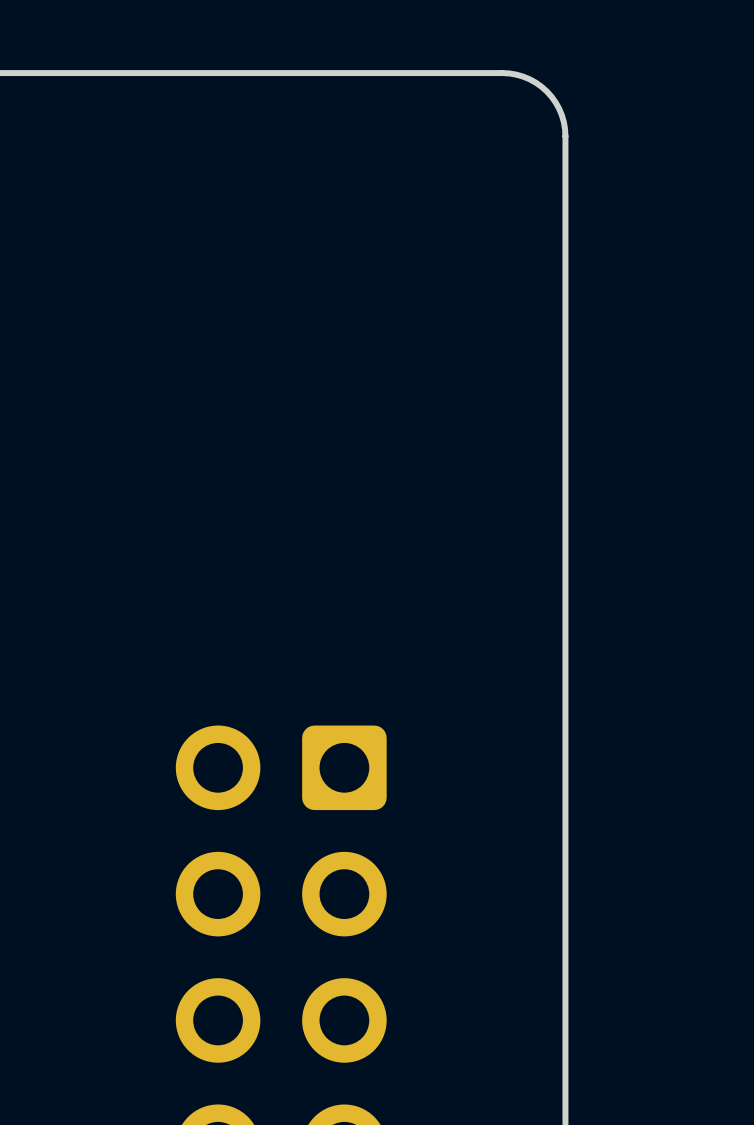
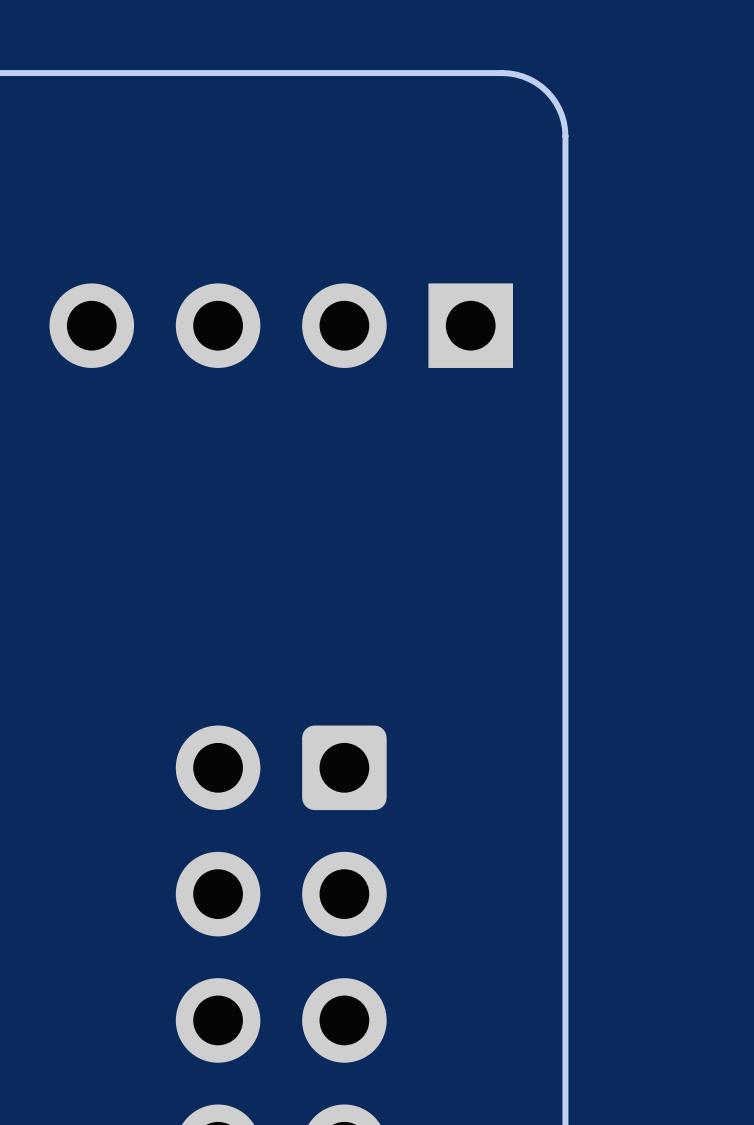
part: none -> (281, 325)

